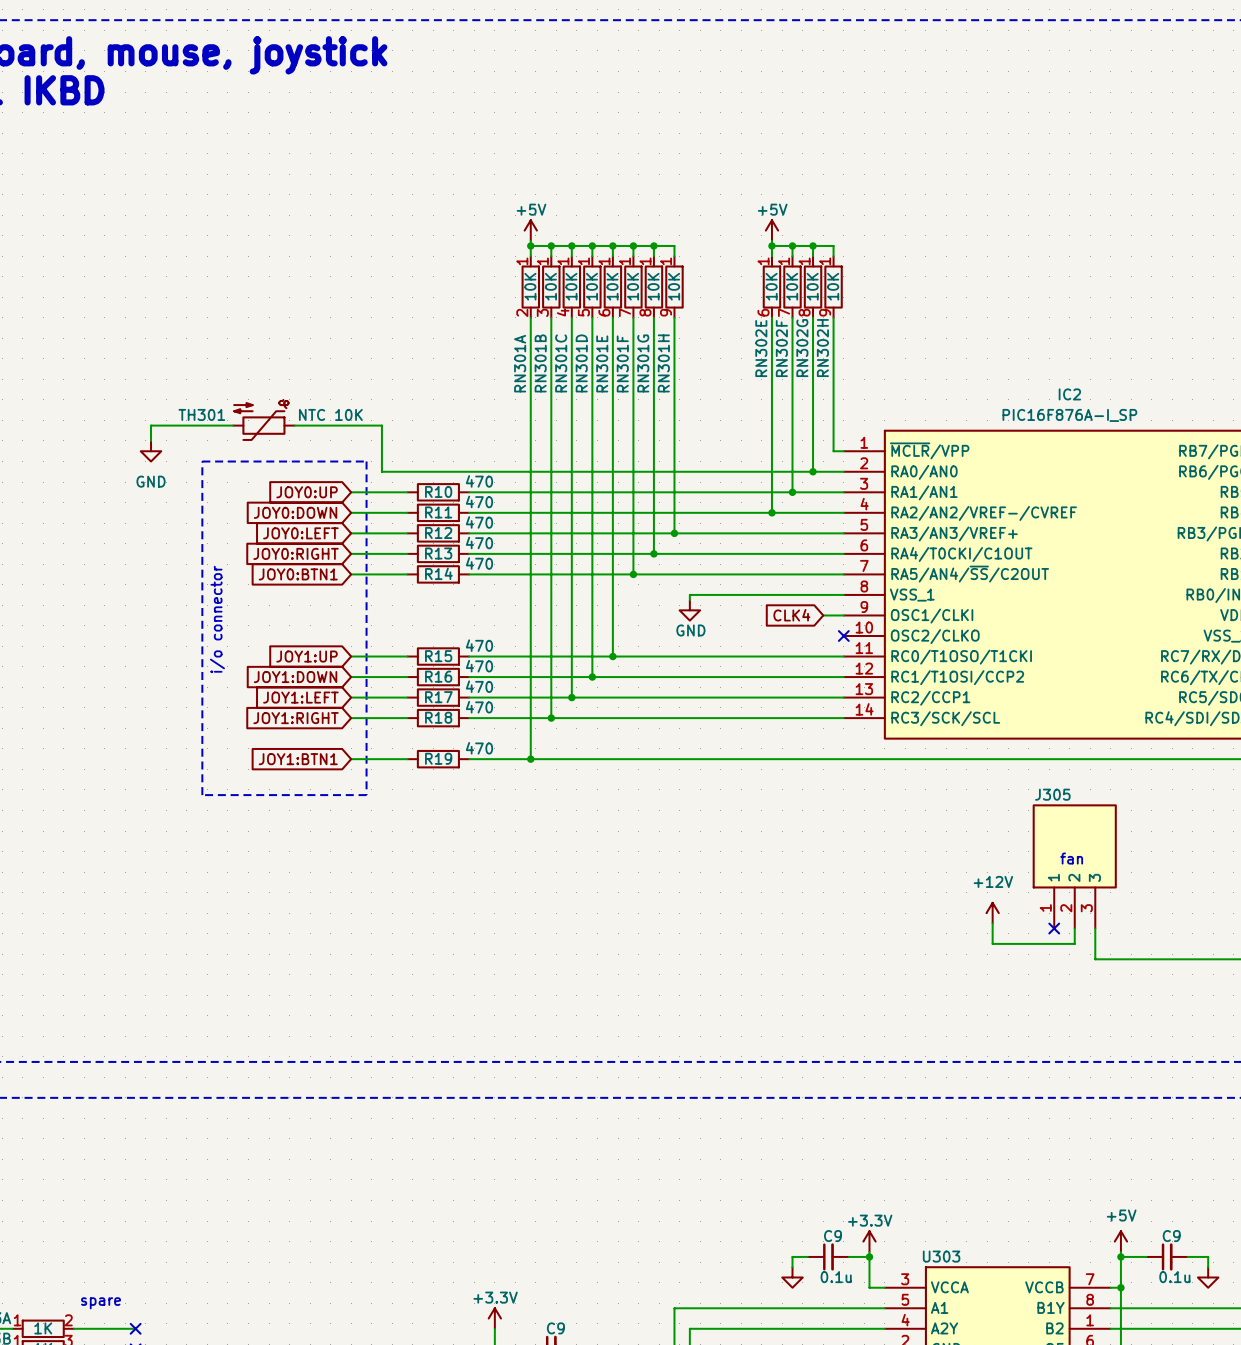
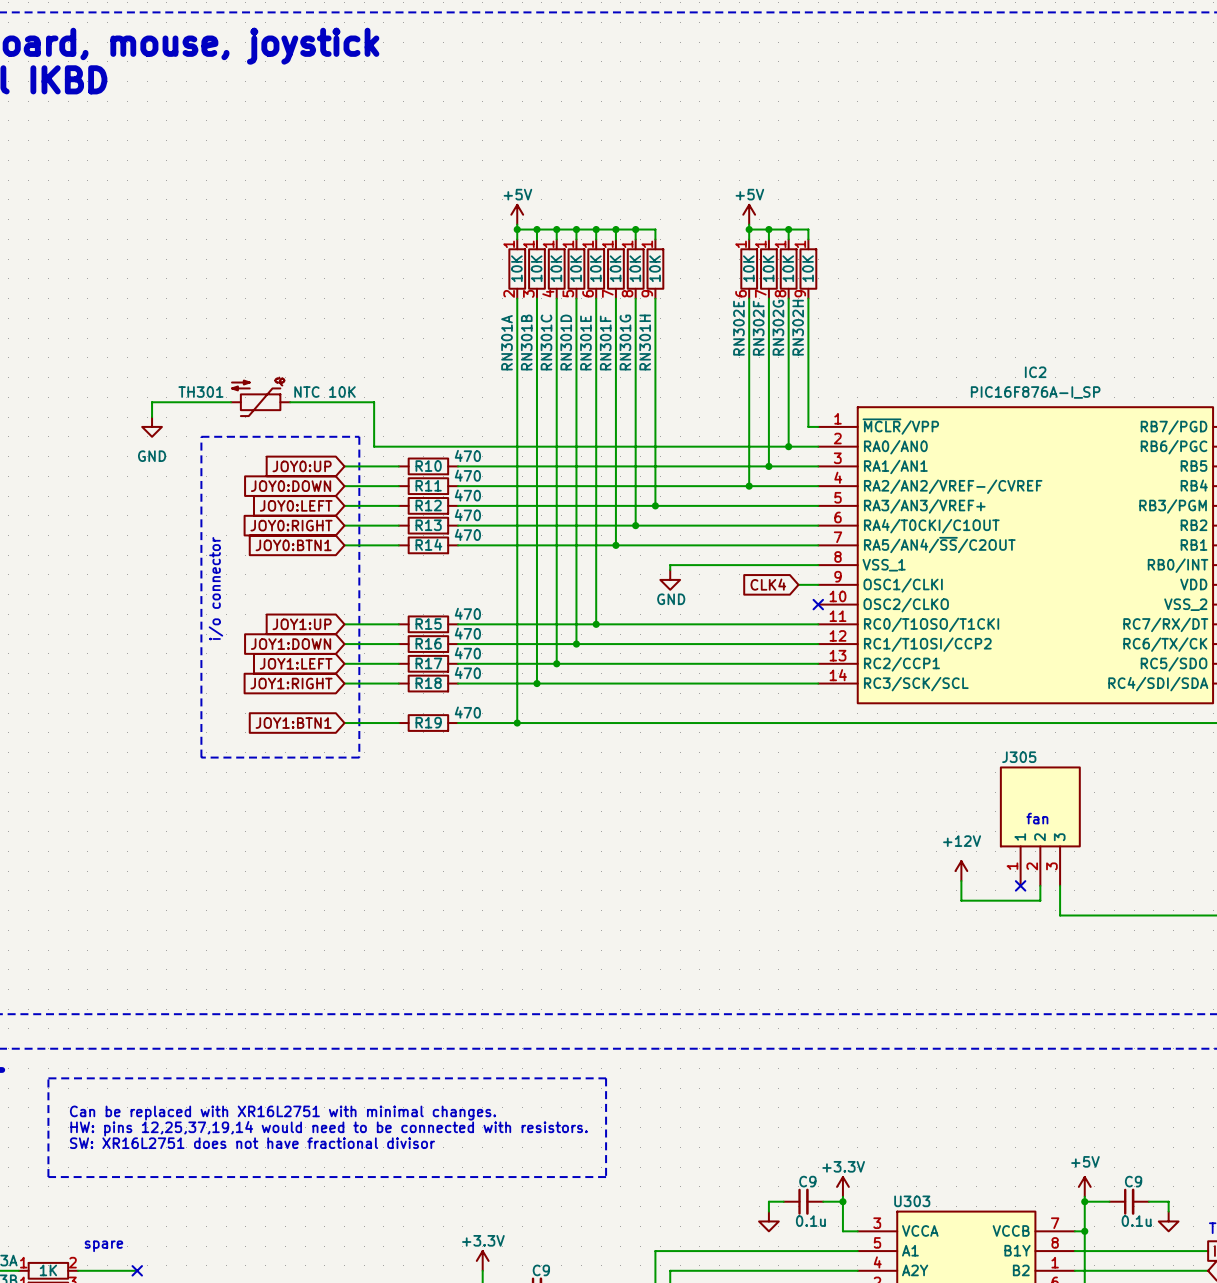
line: none -> (48, 1078) (606, 1078) (606, 1177) (48, 1177) (48, 1078)
text: none -> Can be replaced with XR16L2751 with minimal changes. (283, 1113)
text: none -> HW: pins 12,25,37,19,14 would need to be connected with resistors. (329, 1128)
text: none -> SW: XR16L2751 does not have fractional divisor (252, 1143)

